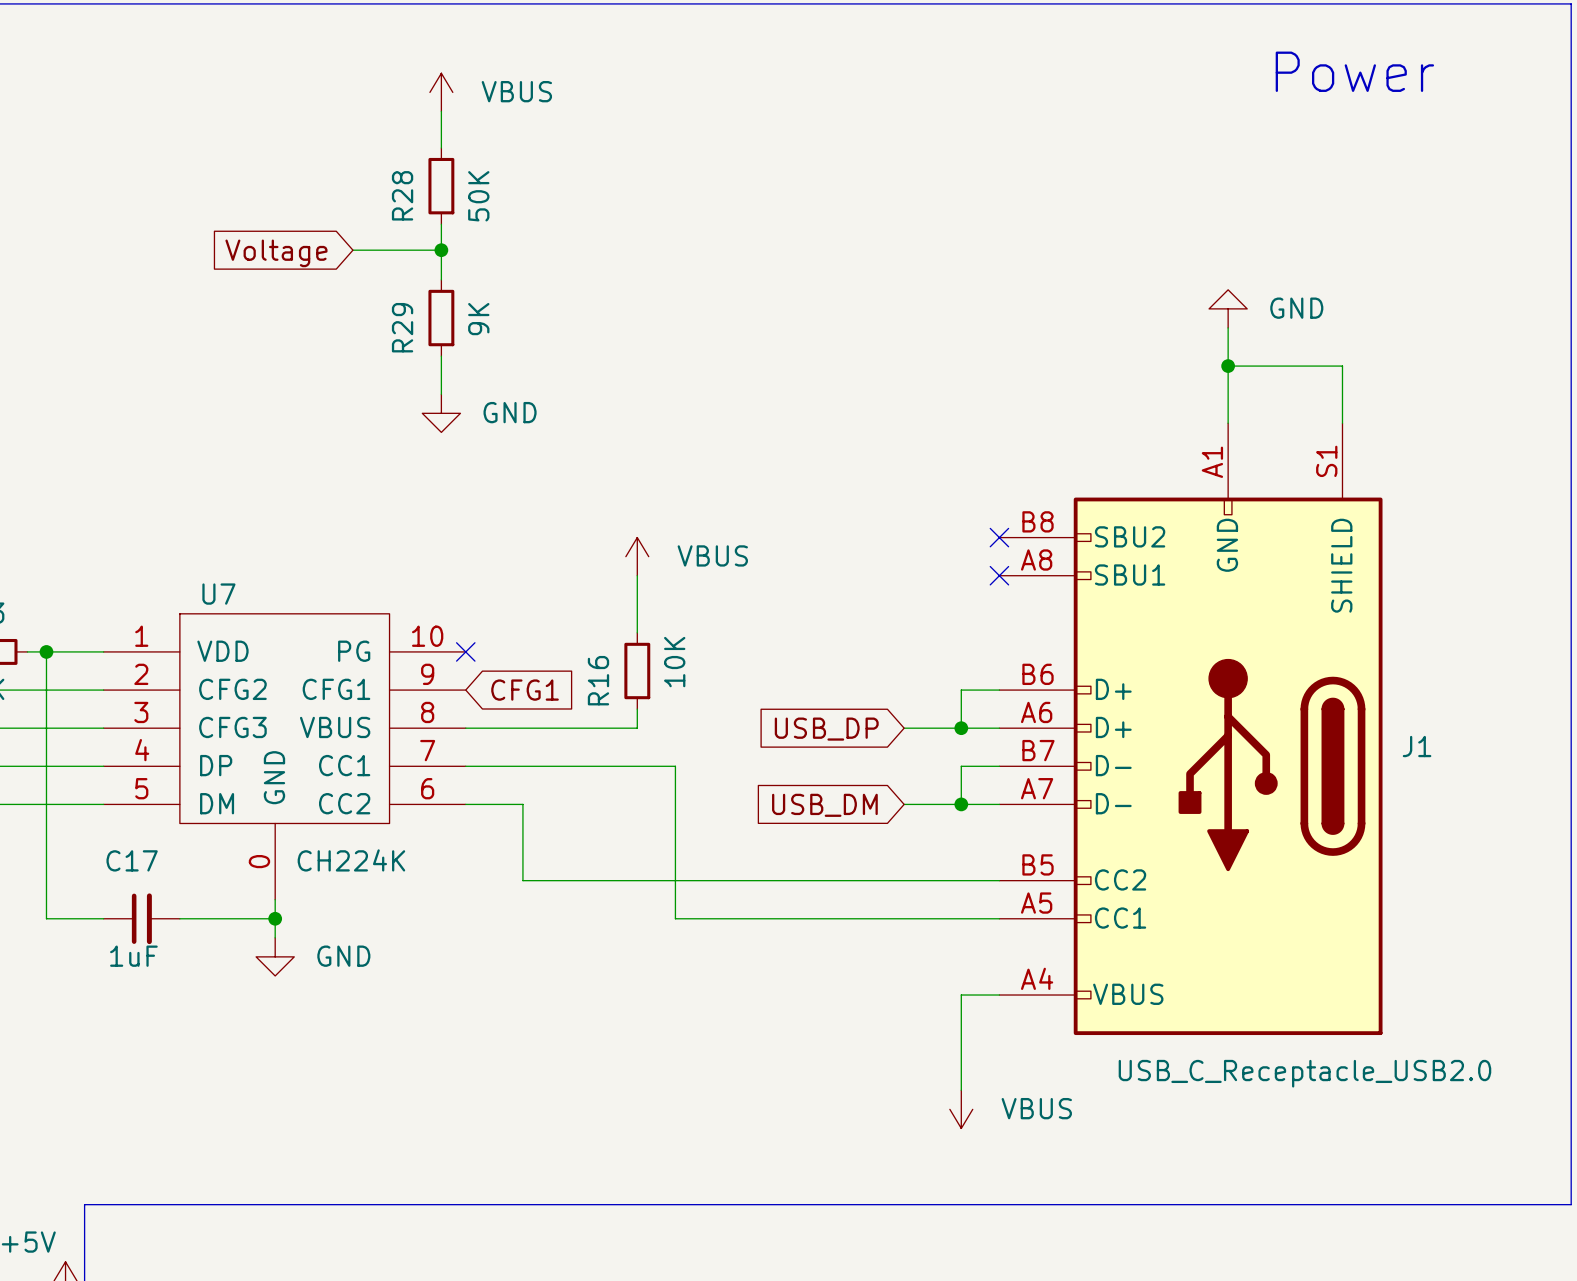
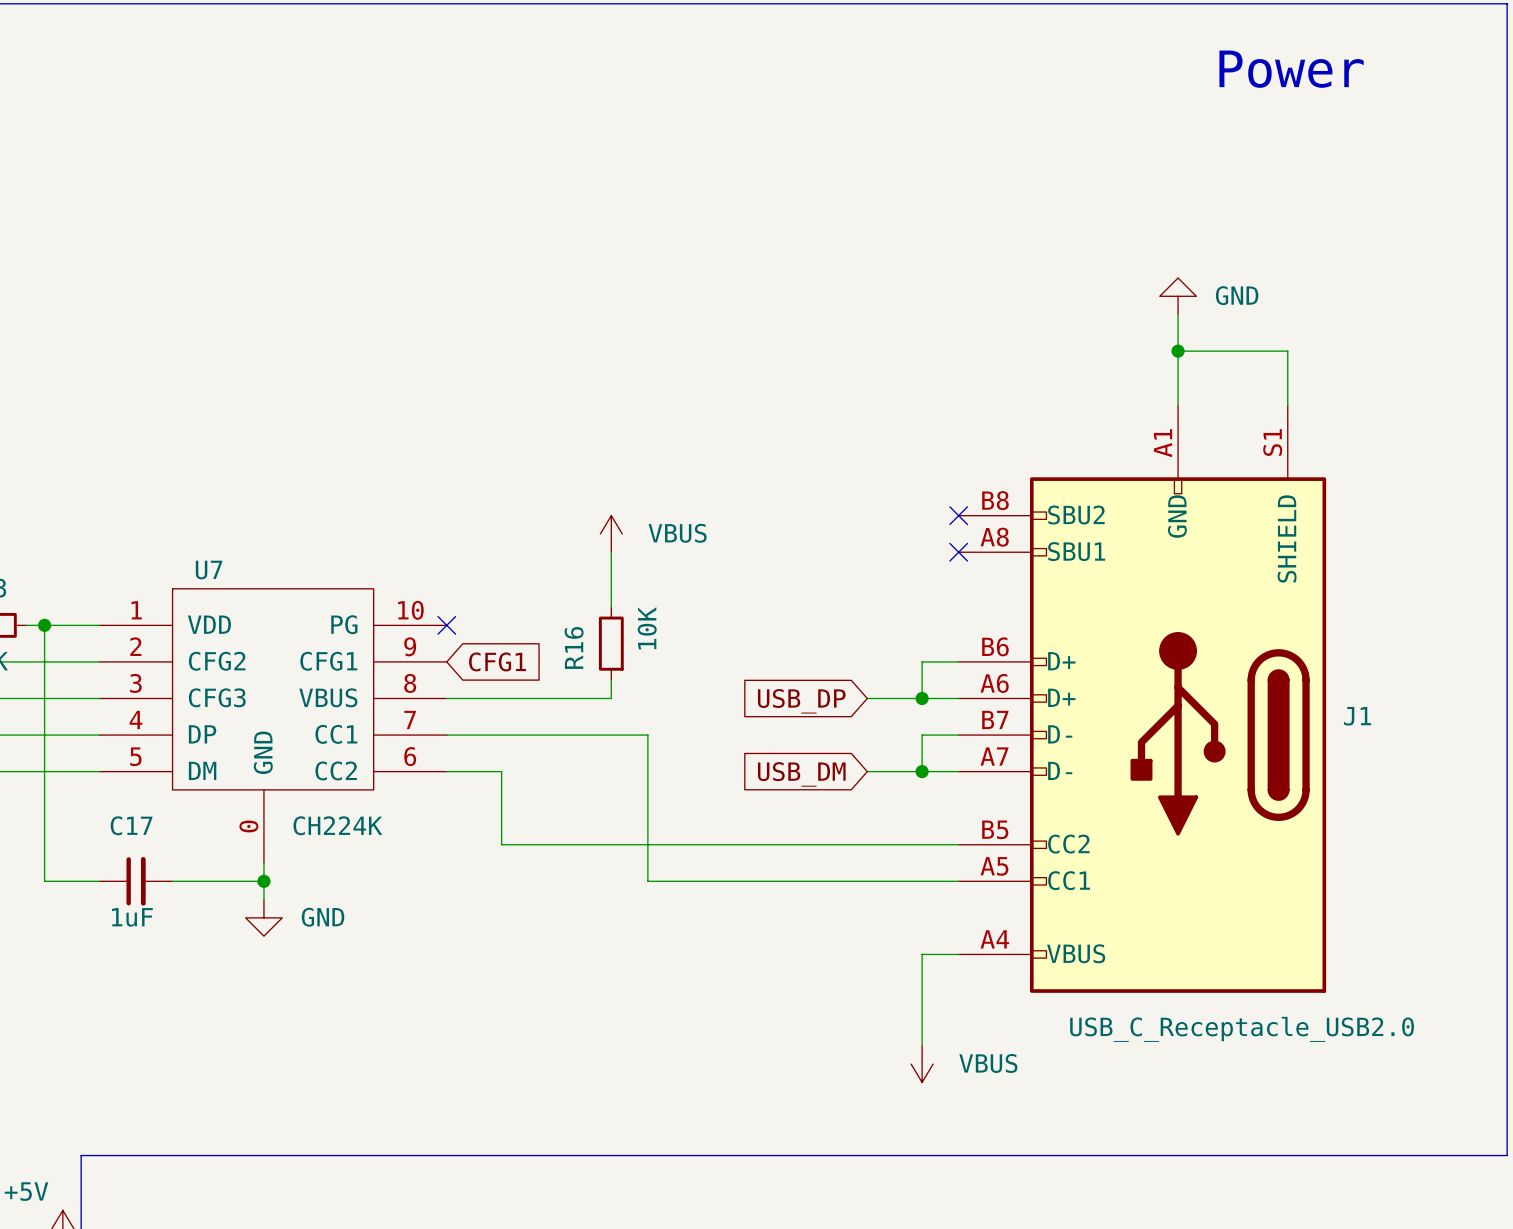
power symbol: VBUS (441, 92) -> none
wire: (441, 111) (441, 148) -> none
R28: 50K (441, 186) -> none
wire: (441, 224) (441, 279) -> none
wire: (352, 250) (441, 250) -> none
junction: (441, 250) -> none
global label: Voltage (276, 253) -> none
R29: 9K (441, 318) -> none
wire: (441, 356) (441, 394) -> none
power symbol: GND (441, 413) -> none

